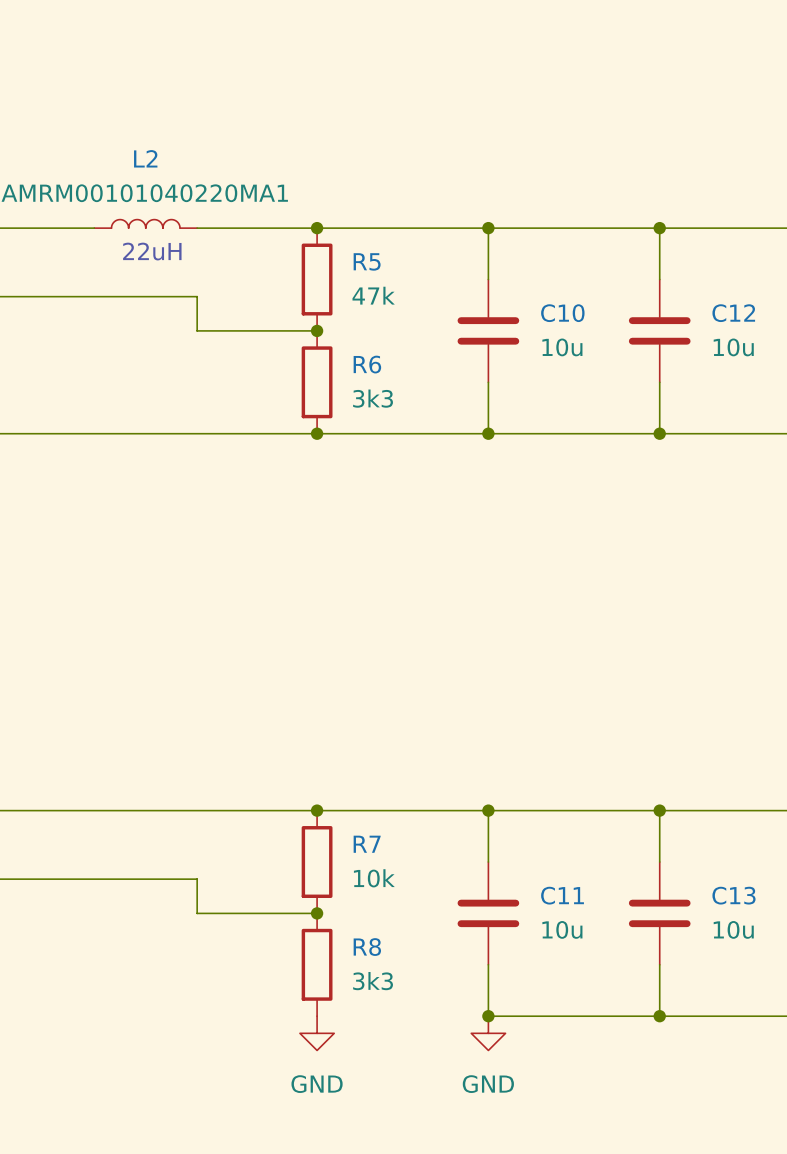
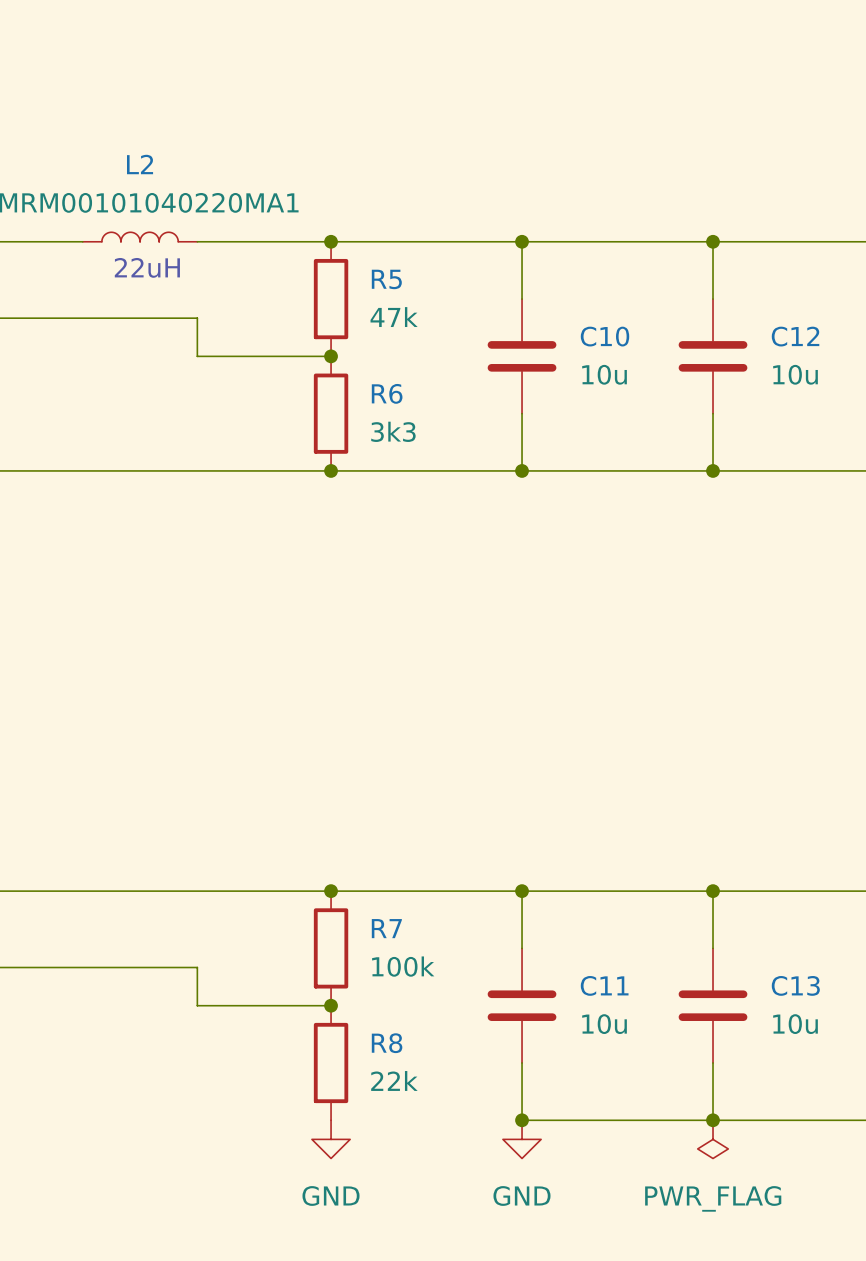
R7 value: 10k (374, 878) -> 100k (403, 966)
R8 value: 3k3 (373, 981) -> 22k (394, 1080)
power symbol: none -> PWR_FLAG (713, 1139)

